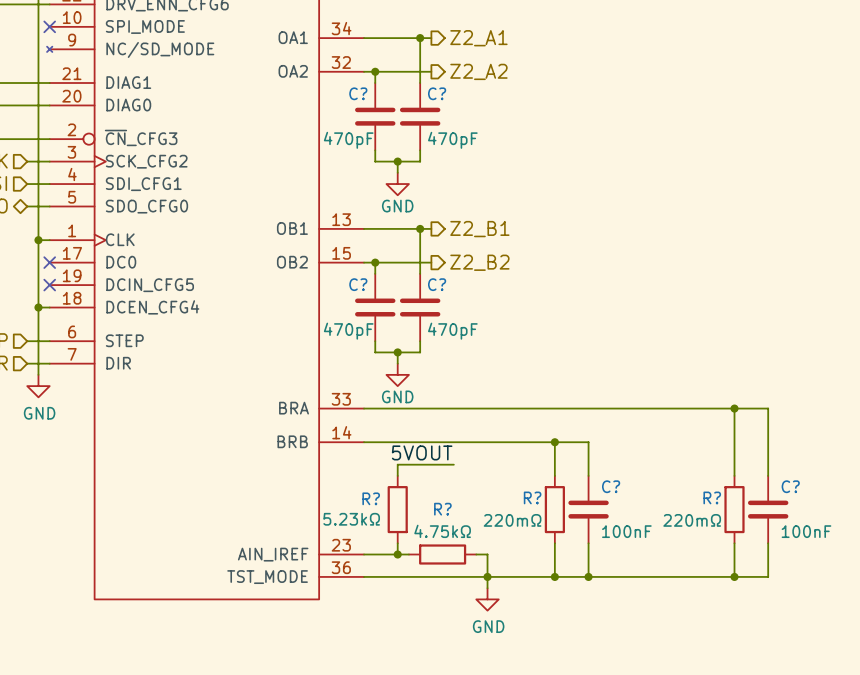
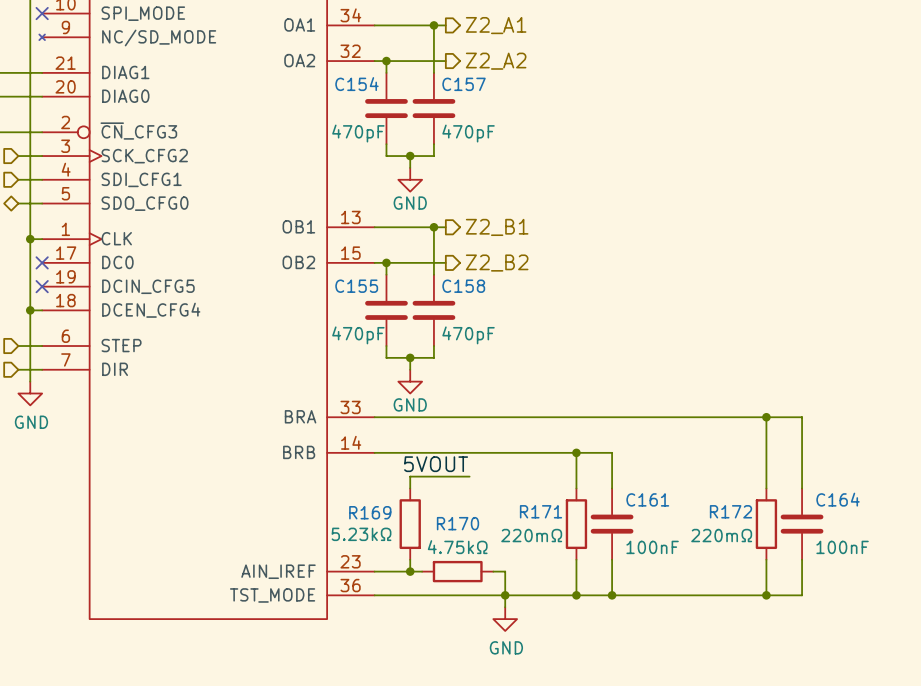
C? name: C? (358, 93) -> C154 (356, 84)
C? name: C? (437, 93) -> C157 (464, 84)
C? name: C? (358, 284) -> C155 (356, 286)
C? name: C? (437, 284) -> C158 (463, 286)
C? name: C? (611, 486) -> C161 (647, 499)
C? name: C? (790, 486) -> C164 (838, 499)
R? name: R? (532, 497) -> R171 (541, 511)
R? name: R? (712, 497) -> R172 (731, 511)
R? name: R? (371, 498) -> R169 (370, 512)
R? name: R? (442, 509) -> R170 (458, 523)

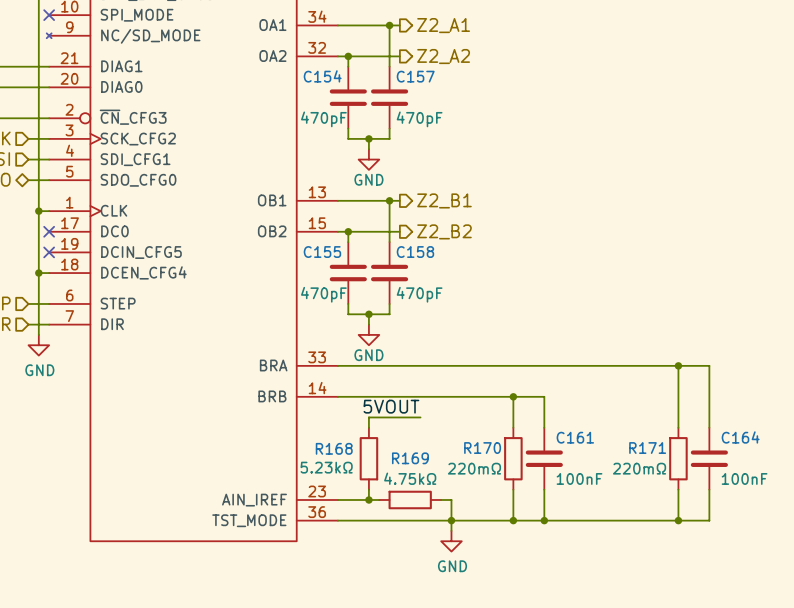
R171 name: R171 (541, 511) -> R170 (482, 448)
R172 name: R172 (731, 511) -> R171 (647, 448)
R169 name: R169 (370, 512) -> R168 (334, 448)
R170 name: R170 (458, 523) -> R169 (410, 458)

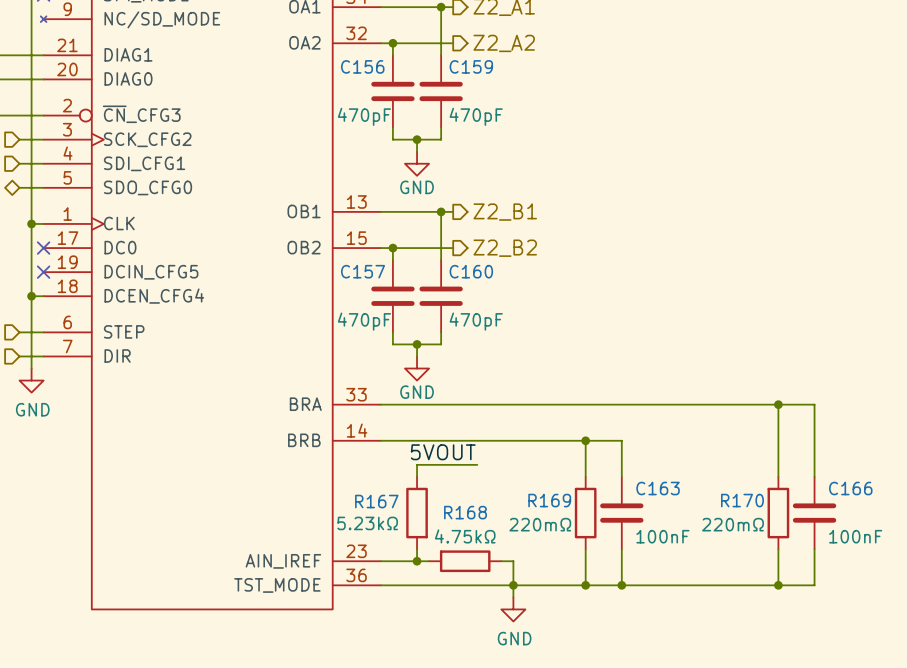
C154 name: C154 (322, 76) -> C156 (362, 66)
C157 name: C157 (415, 76) -> C159 (471, 66)
C155 name: C155 (322, 252) -> C157 (363, 271)
C158 name: C158 (415, 252) -> C160 (471, 271)
C161 name: C161 (575, 437) -> C163 (658, 488)
C164 name: C164 (740, 437) -> C166 (850, 488)
R168 name: R168 (334, 448) -> R167 (376, 501)
R170 name: R170 (482, 448) -> R169 (549, 500)
R171 name: R171 (647, 448) -> R170 (742, 500)
R169 name: R169 (410, 458) -> R168 (465, 512)

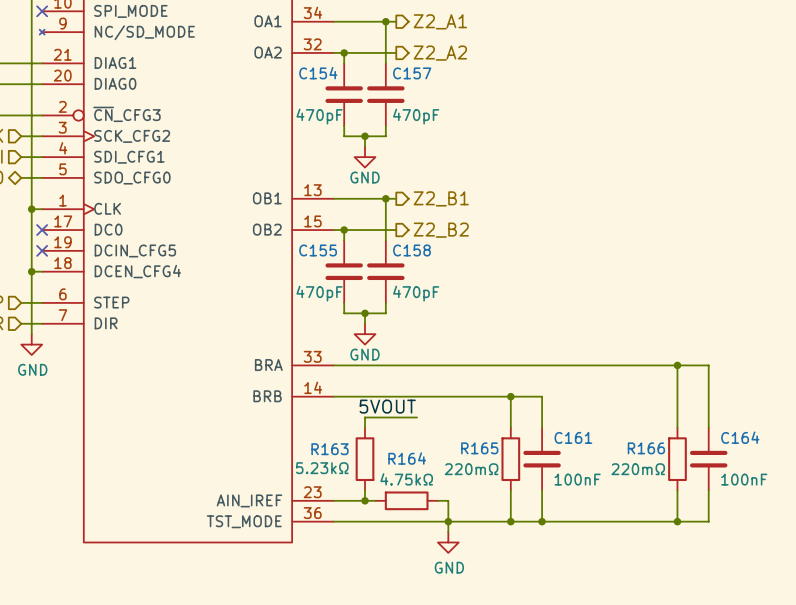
C156 name: C156 (362, 66) -> C154 (318, 73)
C159 name: C159 (471, 66) -> C157 (412, 73)
C157 name: C157 (363, 271) -> C155 (318, 250)
C160 name: C160 (471, 271) -> C158 (411, 250)
C163 name: C163 (658, 488) -> C161 (573, 437)
C166 name: C166 (850, 488) -> C164 (740, 437)
R169 name: R169 (549, 500) -> R165 (479, 448)
R170 name: R170 (742, 500) -> R166 (646, 448)
R167 name: R167 (376, 501) -> R163 (329, 449)
R168 name: R168 (465, 512) -> R164 (407, 458)

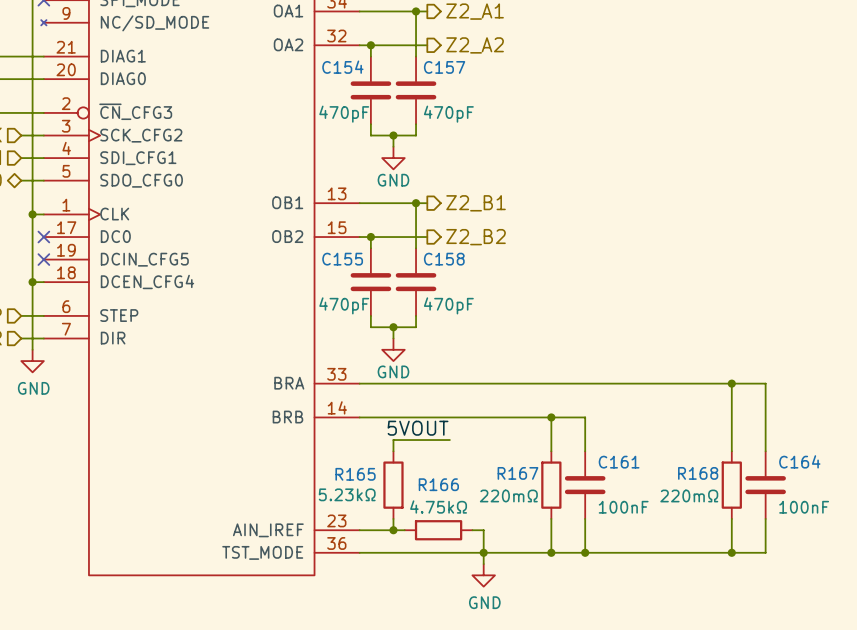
R165 name: R165 (479, 448) -> R167 (517, 473)
R166 name: R166 (646, 448) -> R168 (698, 473)
R163 name: R163 (329, 449) -> R165 (355, 474)
R164 name: R164 (407, 458) -> R166 (438, 484)

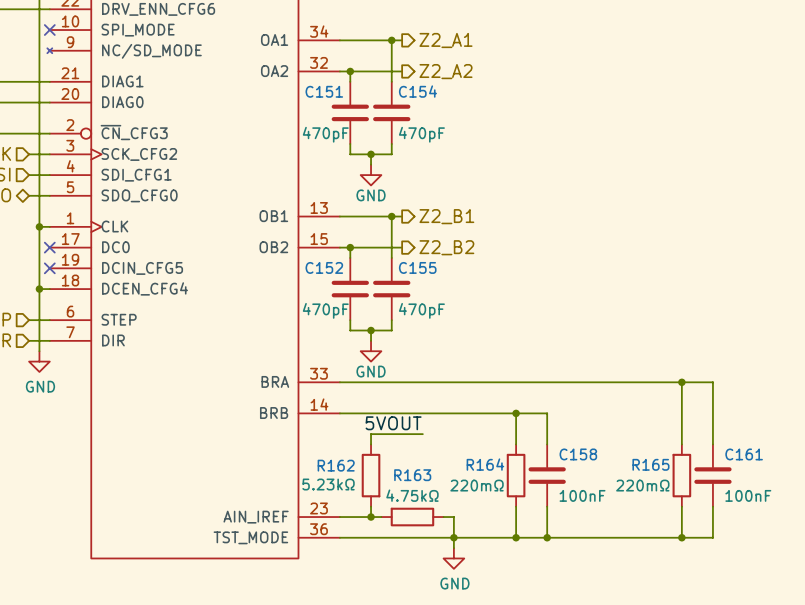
C154 name: C154 (342, 67) -> C151 (324, 91)
C157 name: C157 (444, 67) -> C154 (417, 91)
C155 name: C155 (342, 259) -> C152 (324, 267)
C158 name: C158 (444, 259) -> C155 (417, 267)
C164 name: C164 (799, 461) -> C161 (744, 454)
C161 name: C161 (619, 462) -> C158 (578, 454)
R167 name: R167 (517, 473) -> R164 (485, 464)
R168 name: R168 (698, 473) -> R165 (650, 464)
R165 name: R165 (355, 474) -> R162 (336, 465)
R166 name: R166 (438, 484) -> R163 (412, 475)

